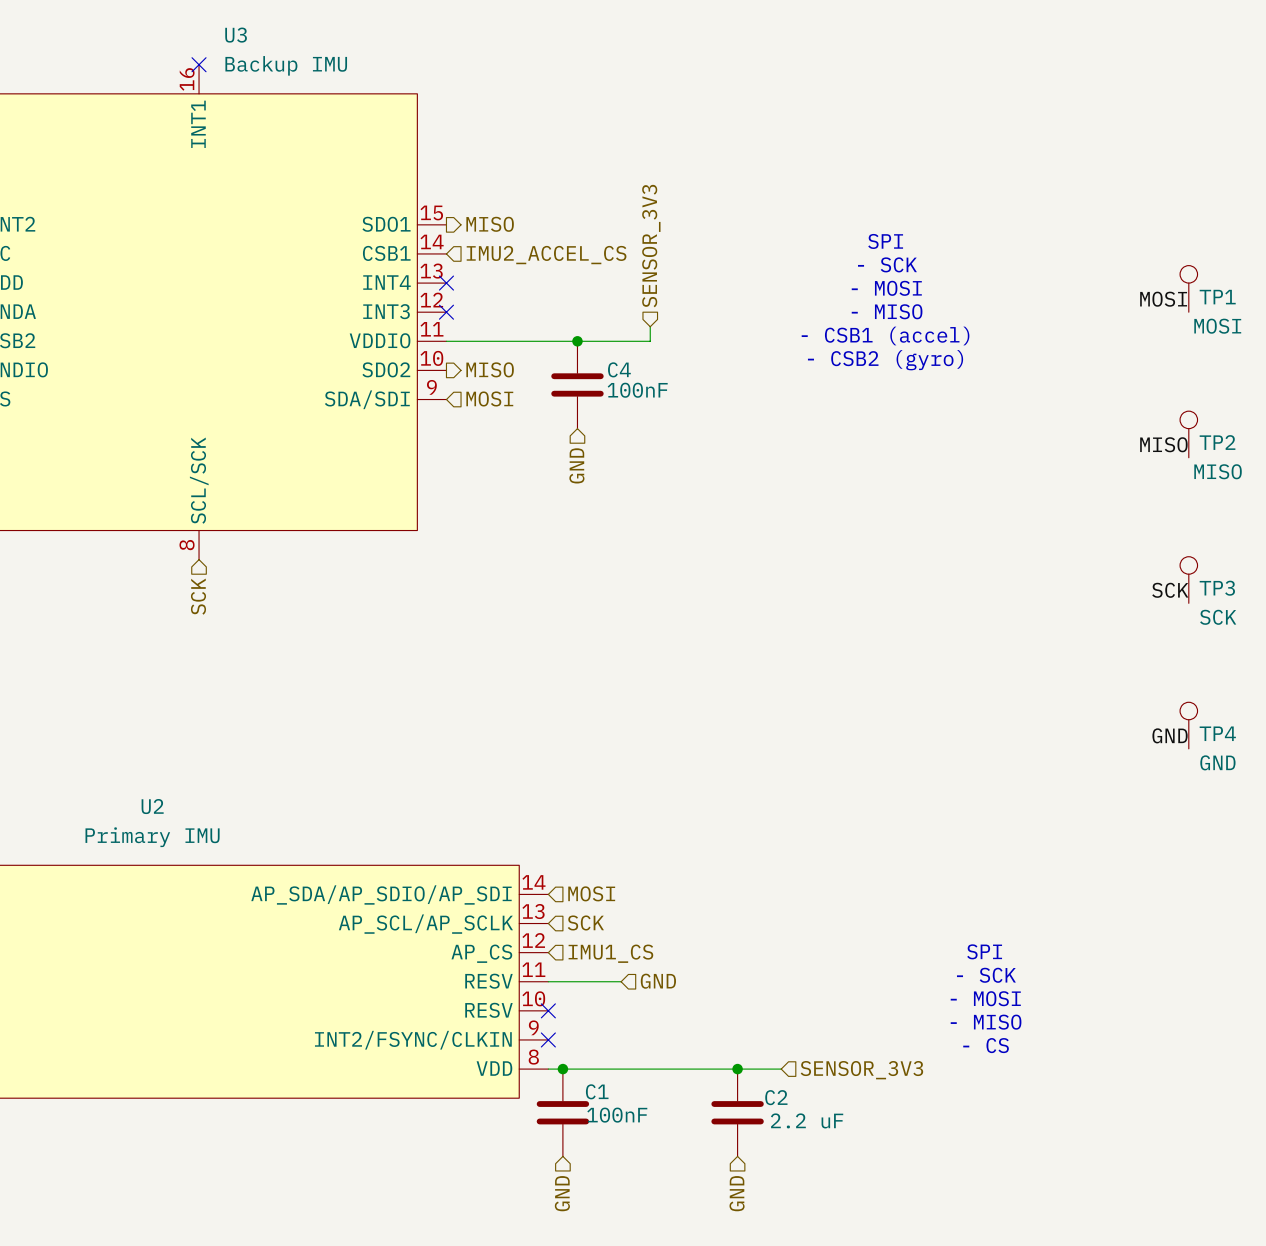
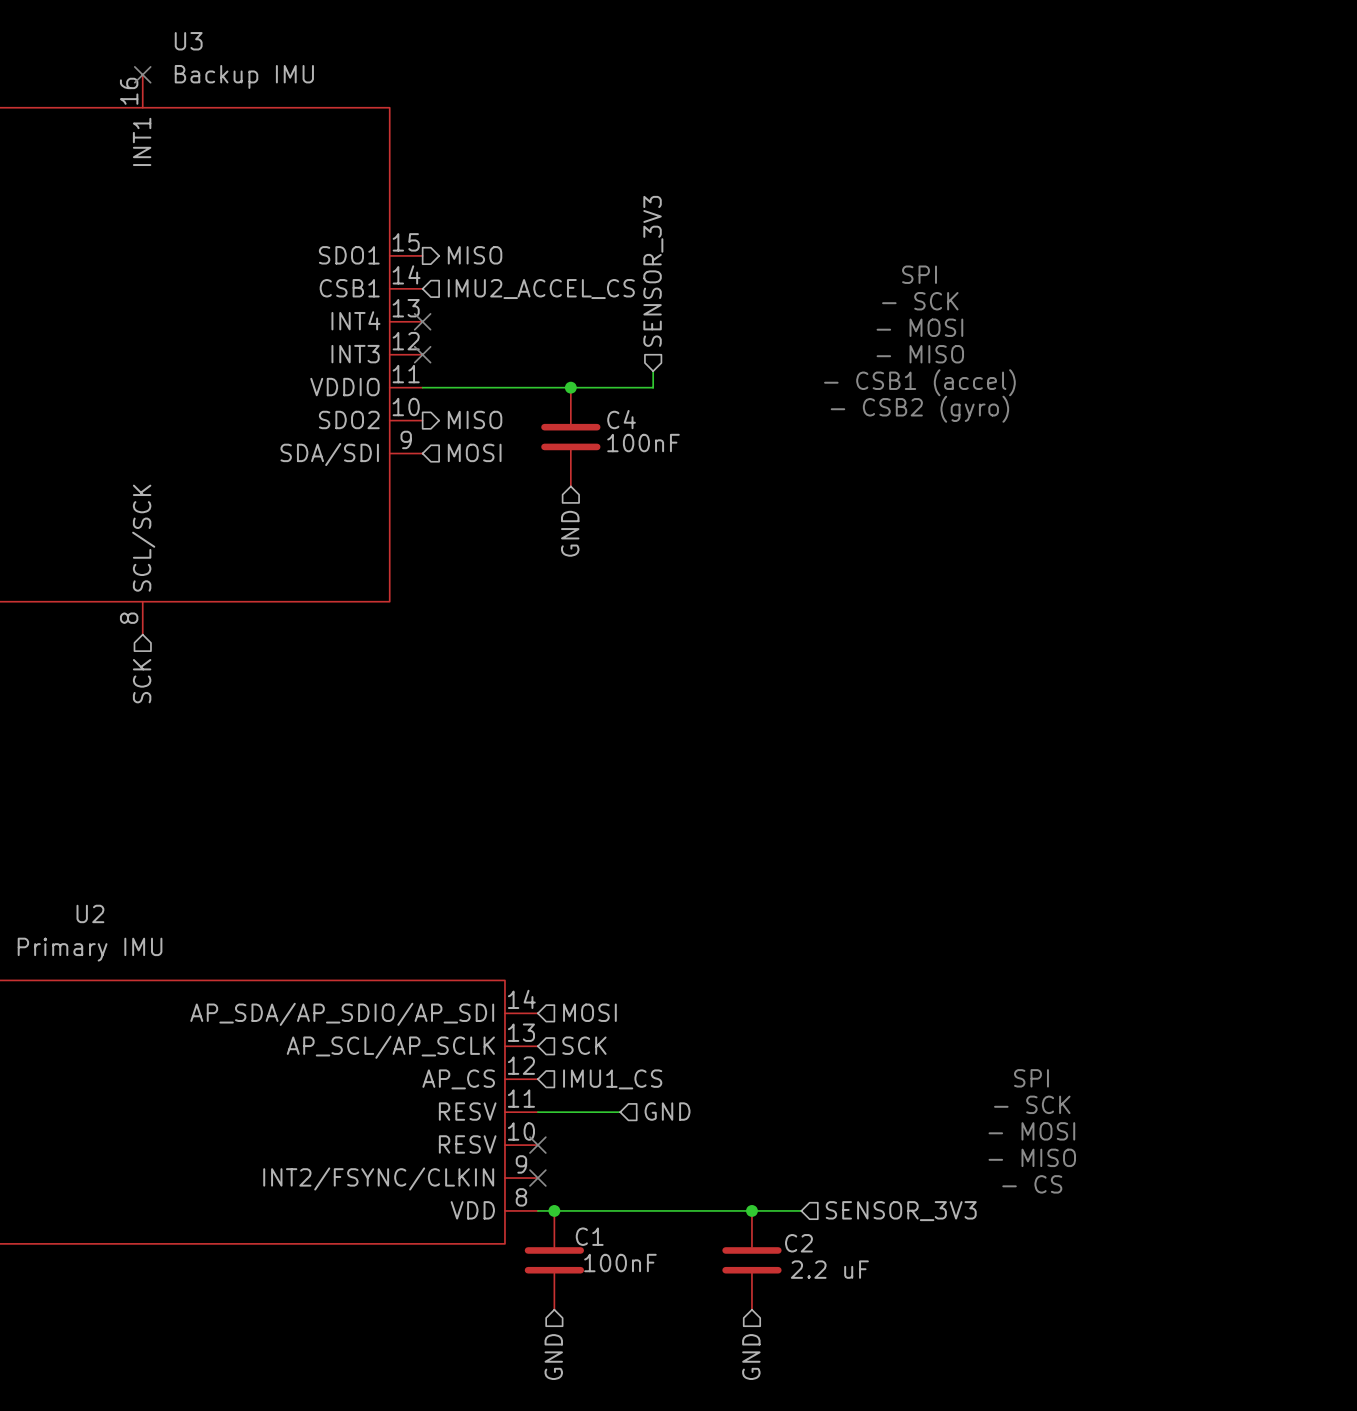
TP1: MOSI (1188, 288) -> none
label: MOSI (1163, 299) -> none
TP2: MISO (1188, 434) -> none
label: MISO (1163, 444) -> none
TP3: SCK (1188, 580) -> none
label: SCK (1170, 590) -> none
TP4: GND (1188, 725) -> none
label: GND (1170, 735) -> none

